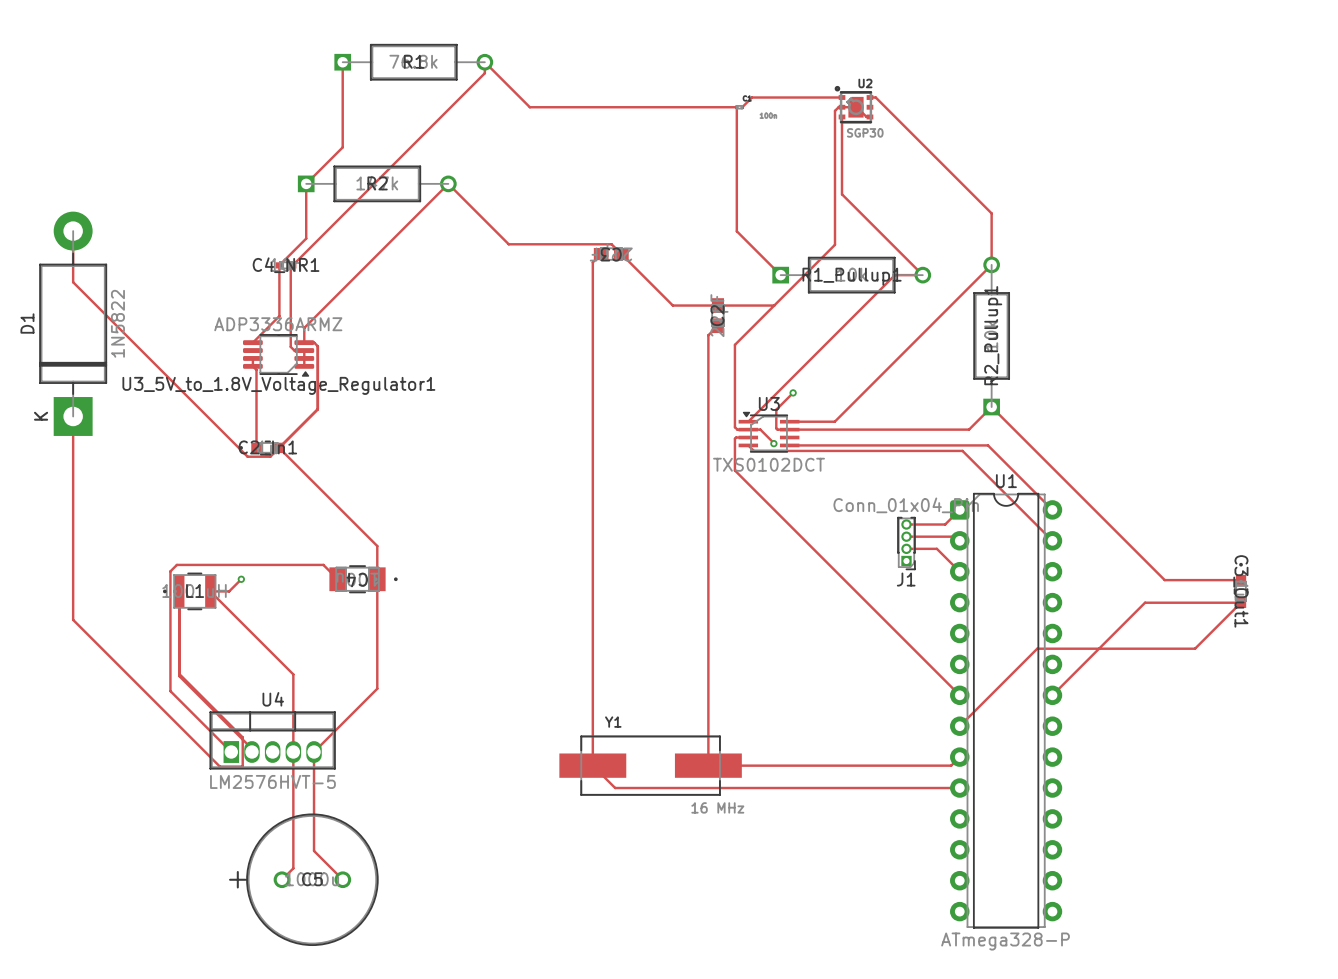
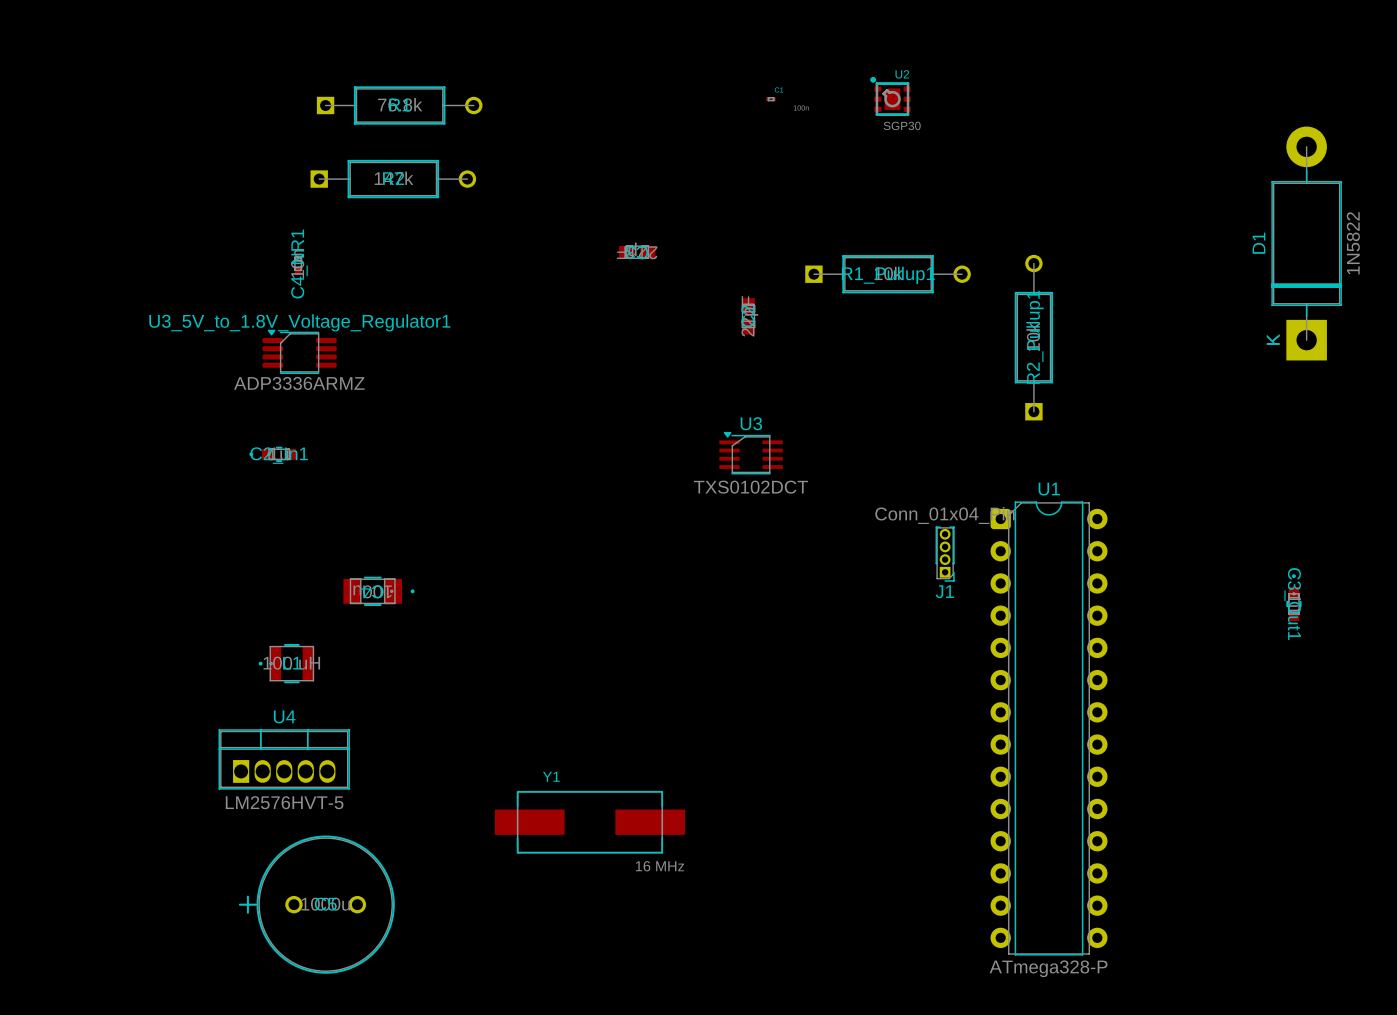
track: (342, 62) (342, 147) (306, 183) (306, 238) (279, 265) (279, 316) (252, 342) -> none
R1 position: (413, 62) -> (399, 105)
track: (842, 97) (752, 97) (742, 107) -> none
track: (869, 97) (875, 97) (991, 213) (991, 264) (834, 421) (789, 421) -> none
track: (842, 116) (842, 194) (922, 275) (894, 275) (748, 421) -> none
track: (869, 116) (866, 116) (856, 107) (838, 107) (834, 110) (834, 244) (734, 344) (734, 427) (737, 429) (760, 429) (773, 443) -> none
track: (73, 231) (73, 282) (247, 456) (270, 456) (317, 409) (317, 346) (314, 342) (304, 342) (304, 327) (448, 183) (508, 244) (611, 244) (672, 305) (774, 305) -> none
track: (601, 254) (592, 262) (592, 765) (615, 788) (959, 788) -> none
C4_NR1 rotation: 0° (286, 265) -> 90° counterclockwise (298, 264)
track: (780, 275) (736, 231) (736, 107) (529, 107) (484, 62) (484, 73) (290, 267) (290, 346) (294, 350) (304, 350) (304, 366) -> none
D1 position: (73, 323) -> (1306, 243)
track: (717, 325) (708, 335) (708, 765) (951, 765) (959, 757) -> none
U3_5V_to_1.8V_Voltage_Regulator1 rotation: 0° (278, 355) -> 180° (299, 351)
track: (252, 358) (252, 366) (256, 369) (256, 447) -> none
track: (793, 392) (776, 409) (777, 429) (969, 429) (991, 407) (1164, 580) (1241, 580) -> none
via: (793, 392) -> none
track: (317, 409) (279, 447) (377, 546) (377, 688) (314, 752) (314, 850) (342, 879) -> none
track: (73, 416) (73, 619) (219, 766) (242, 766) (242, 737) (179, 673) -> none
U3 position: (769, 432) -> (751, 453)
track: (748, 437) (734, 438) (734, 470) (959, 695) -> none
via: (773, 443) -> none
track: (748, 445) (753, 450) (962, 450) (1052, 540) -> none
track: (789, 445) (987, 445) (1052, 509) -> none
track: (959, 509) (945, 524) (906, 524) -> none
track: (906, 536) (955, 536) (959, 540) -> none
track: (906, 548) (936, 548) (959, 571) -> none
track: (241, 579) (229, 591) (210, 591) (293, 674) (293, 868) (281, 879) -> none
via: (241, 579) -> none
track: (337, 579) (323, 564) (176, 564) (170, 571) (170, 691) (231, 752) -> none
track: (179, 591) (179, 676) (251, 748) (251, 752) -> none
L1 position: (189, 591) -> (286, 663)
track: (1052, 695) (1145, 602) (1241, 602) (1195, 648) (1037, 648) (959, 726) -> none
Y1 position: (650, 765) -> (589, 822)

